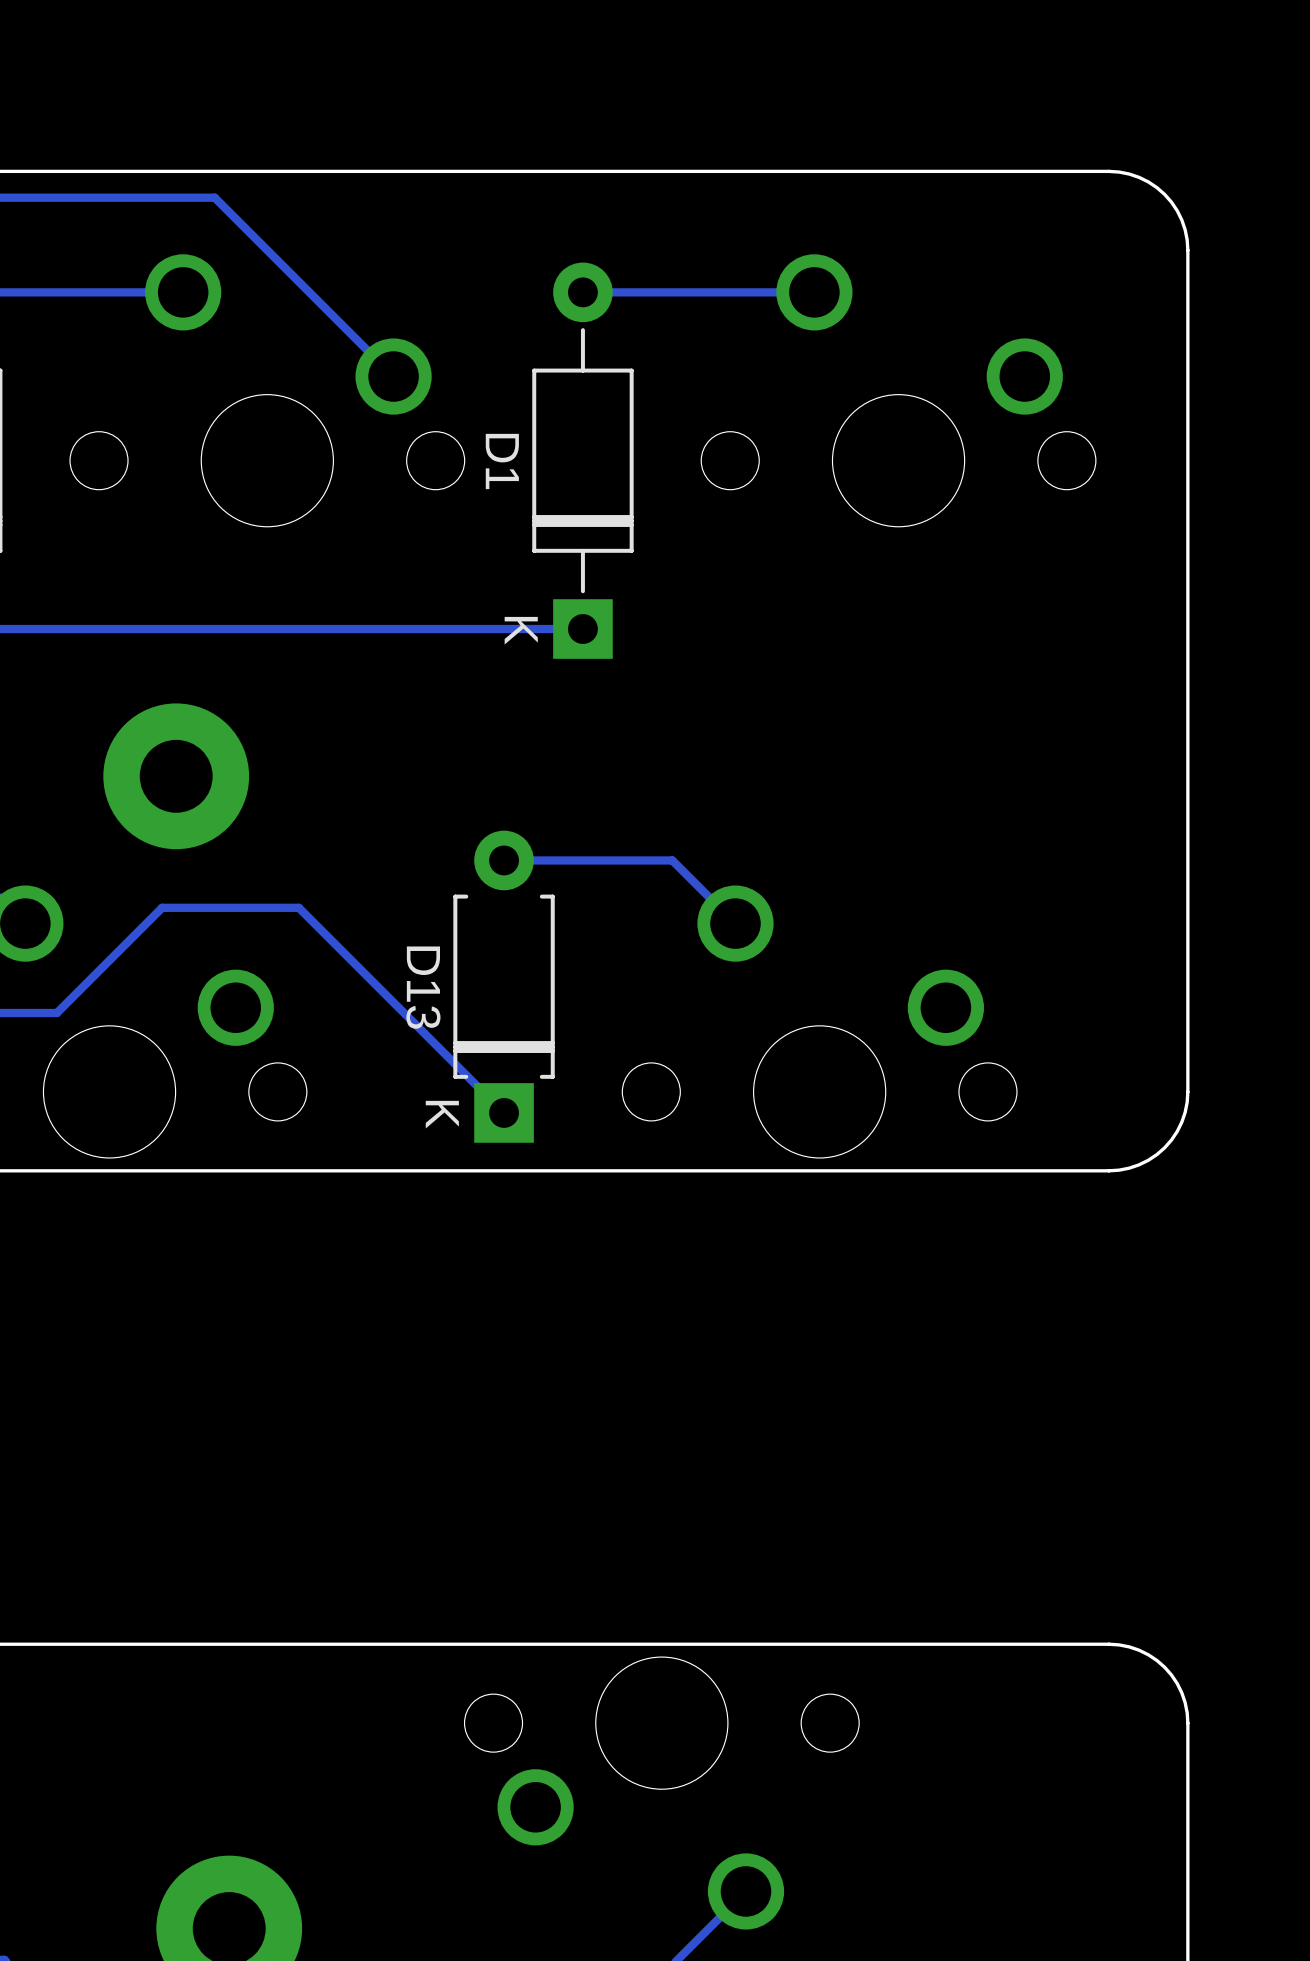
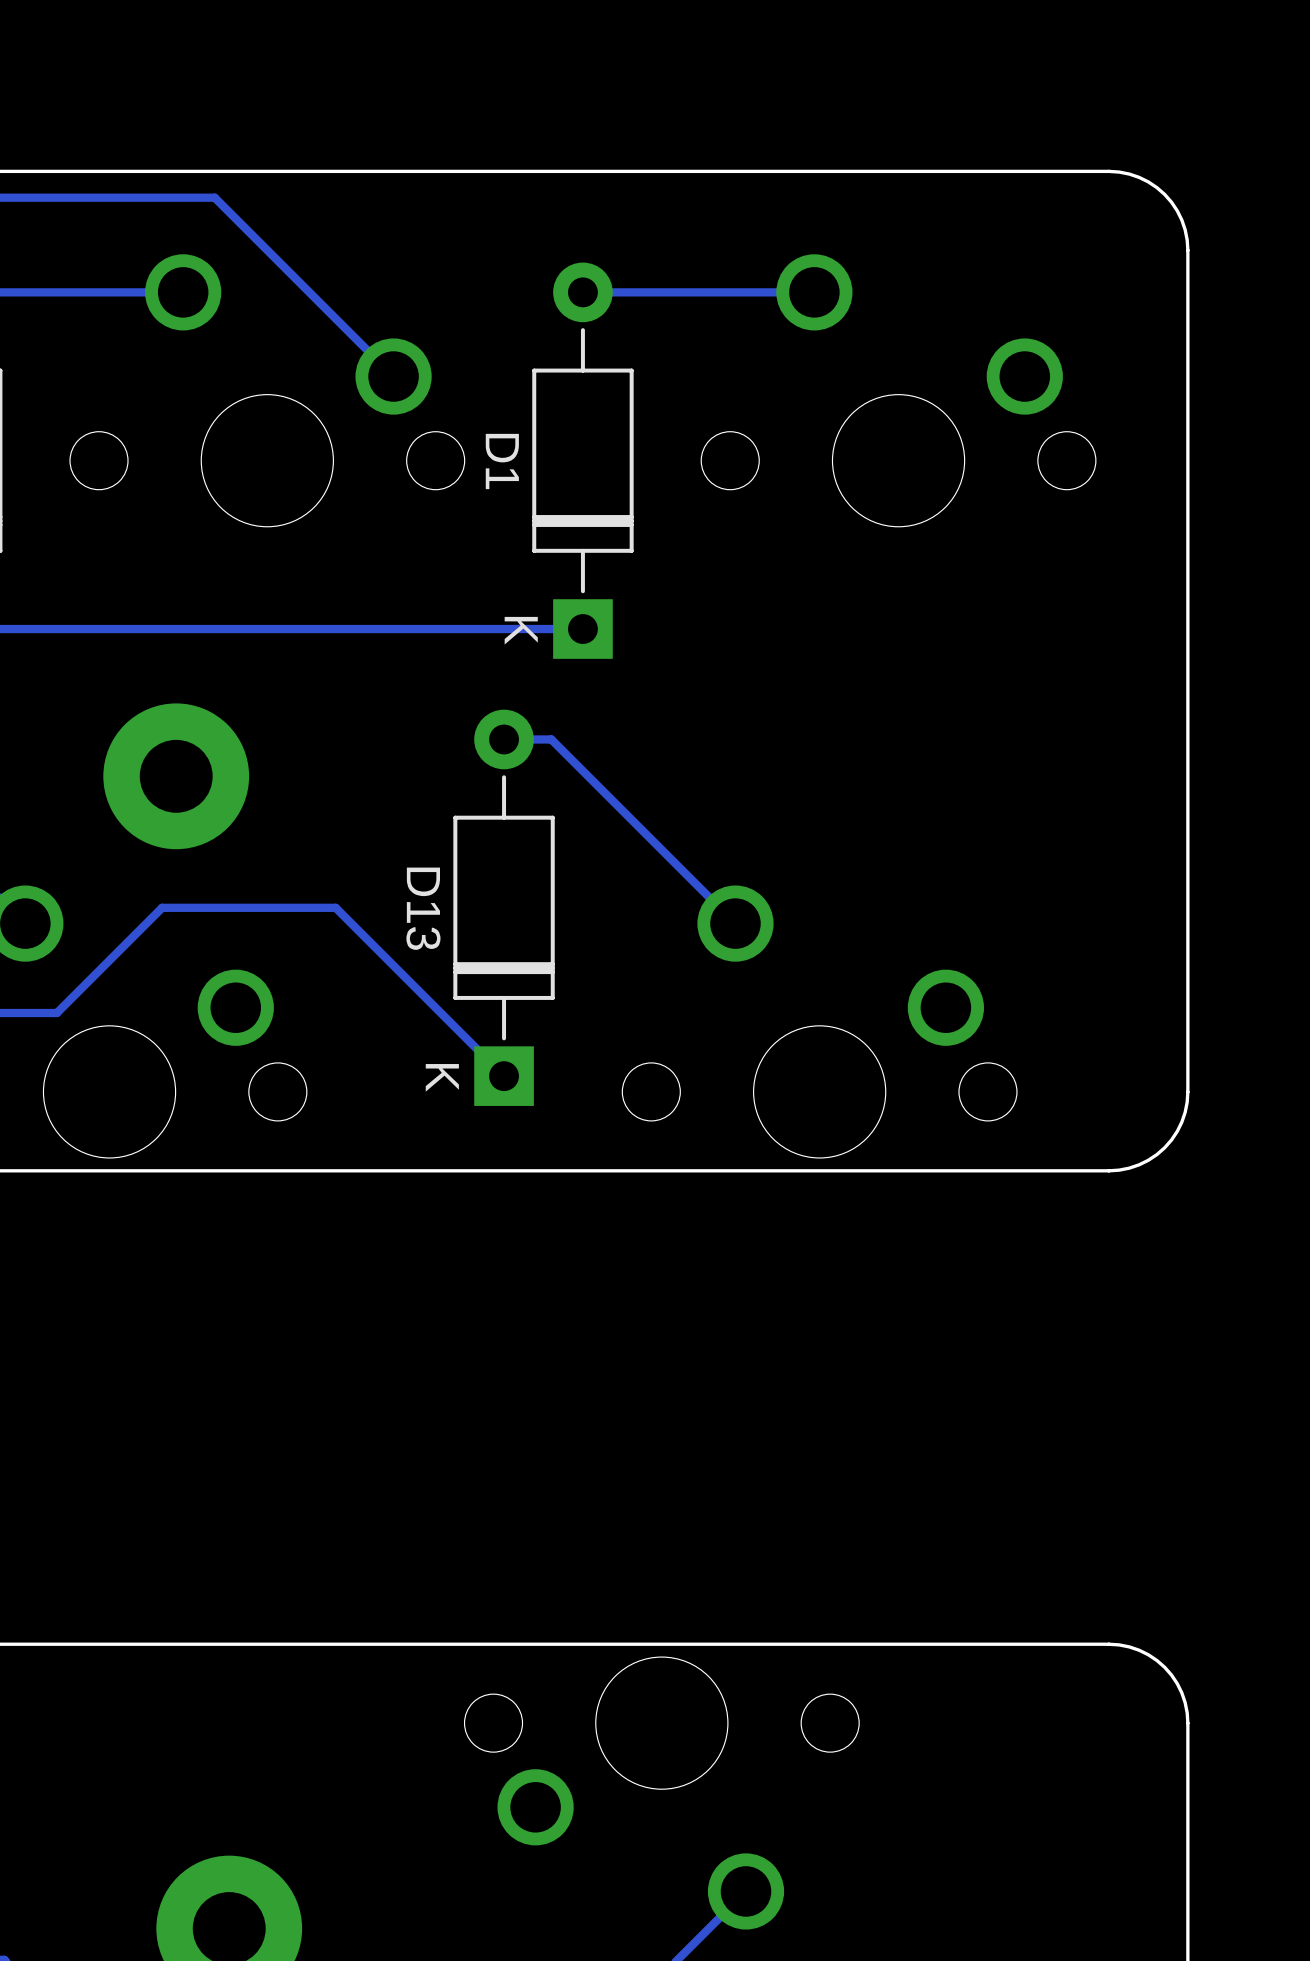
D13 footprint: [453, 830, 555, 1143] -> [453, 709, 555, 1106]
track: (672, 860) (504, 860) -> (672, 860) (551, 739) (504, 739)
track: (298, 907) (504, 1112) -> (298, 907) (335, 907) (504, 1076)

